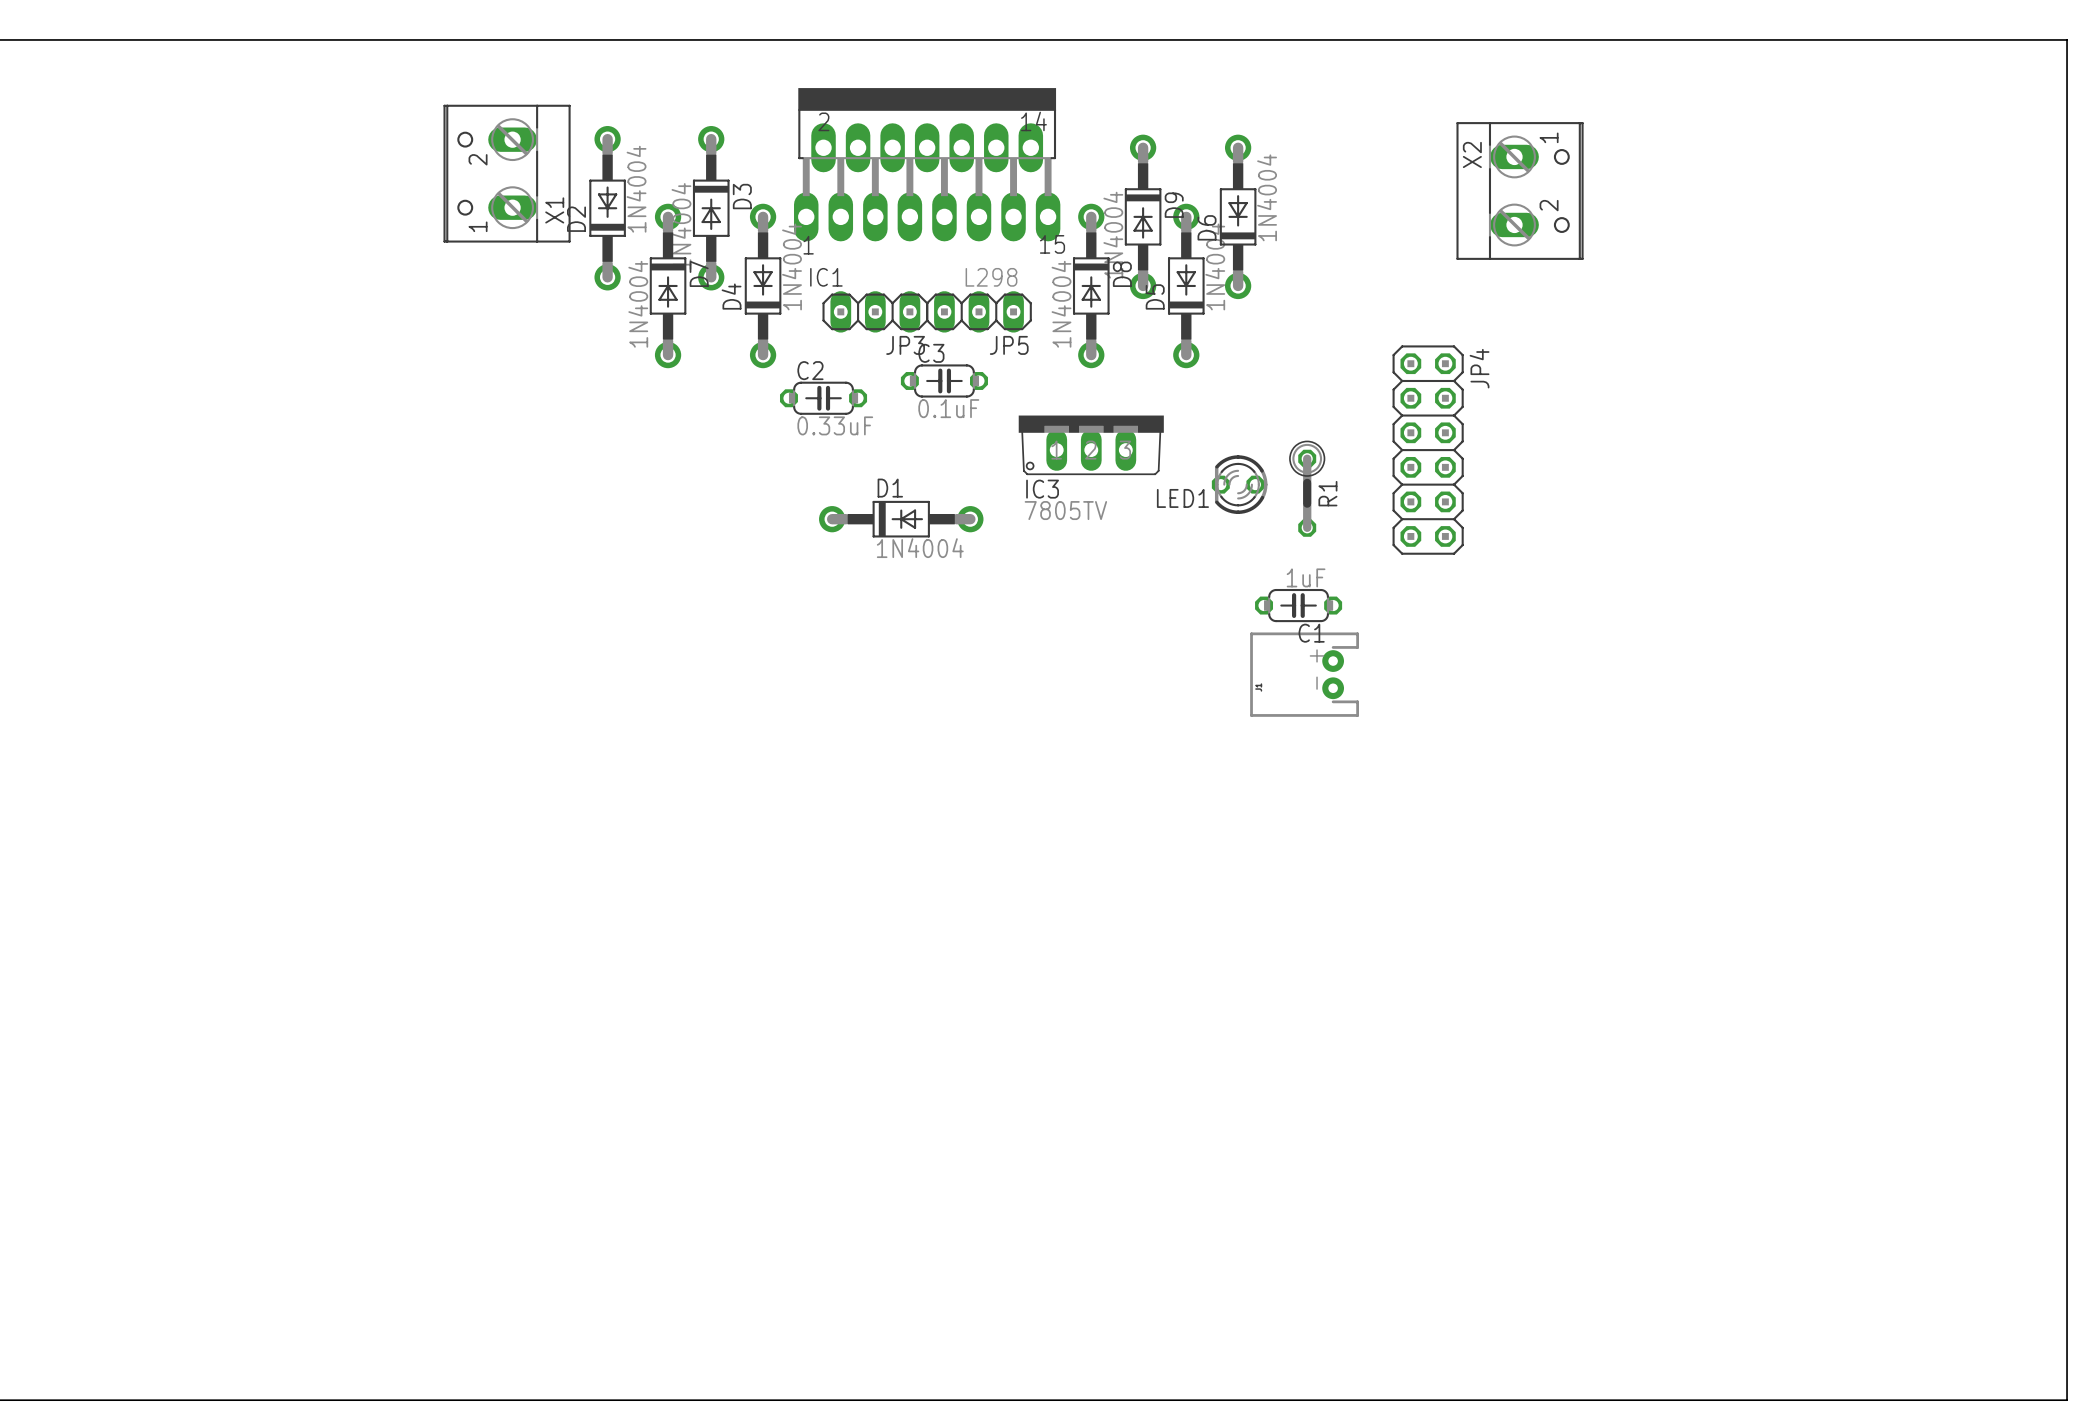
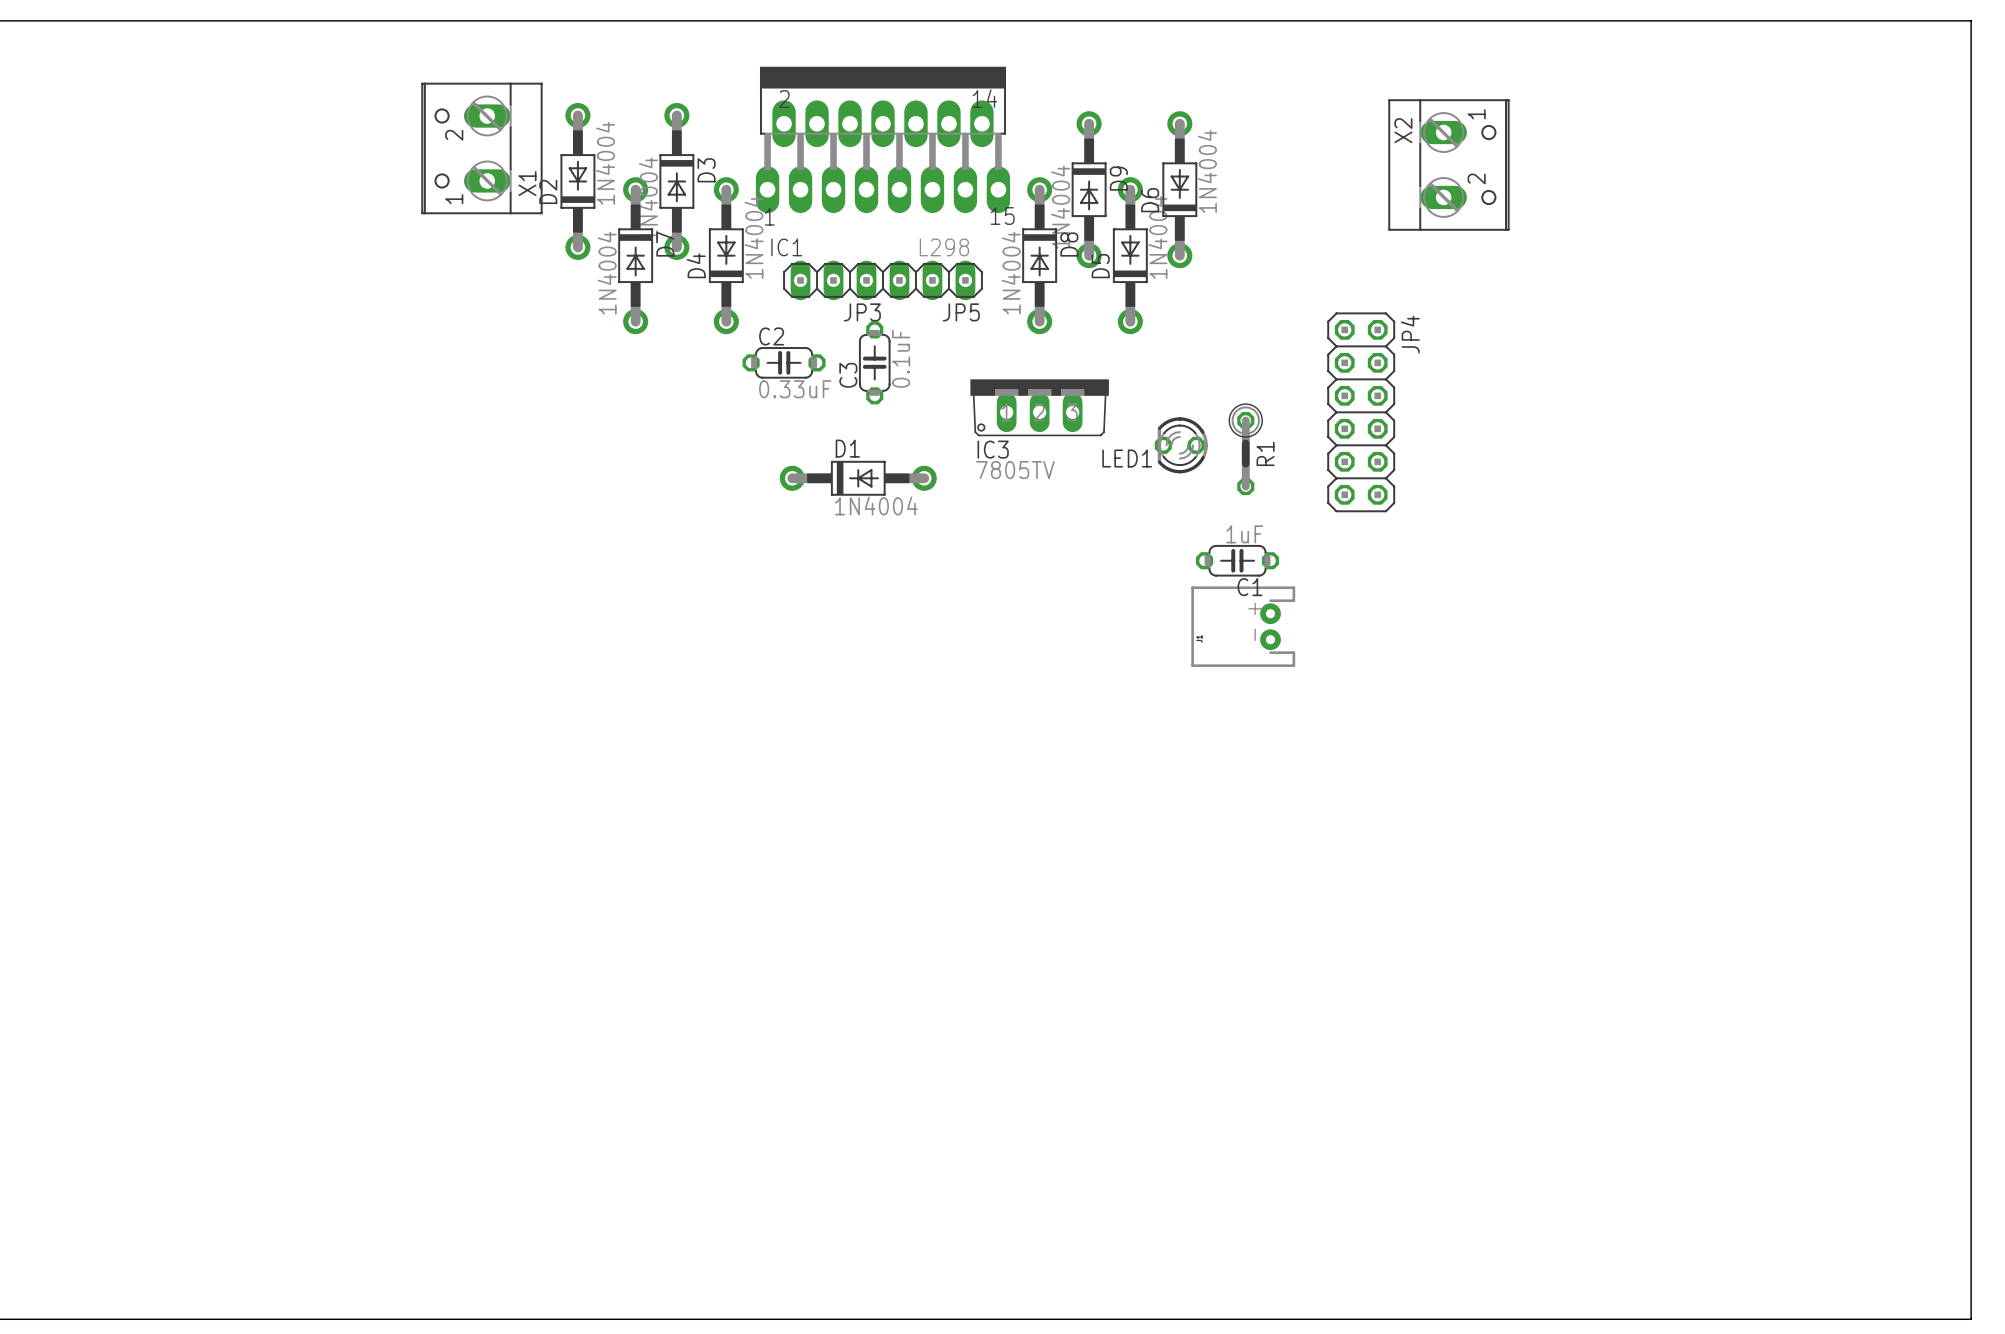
C3 rotation: 0° (944, 380) -> 90° counterclockwise (874, 362)

